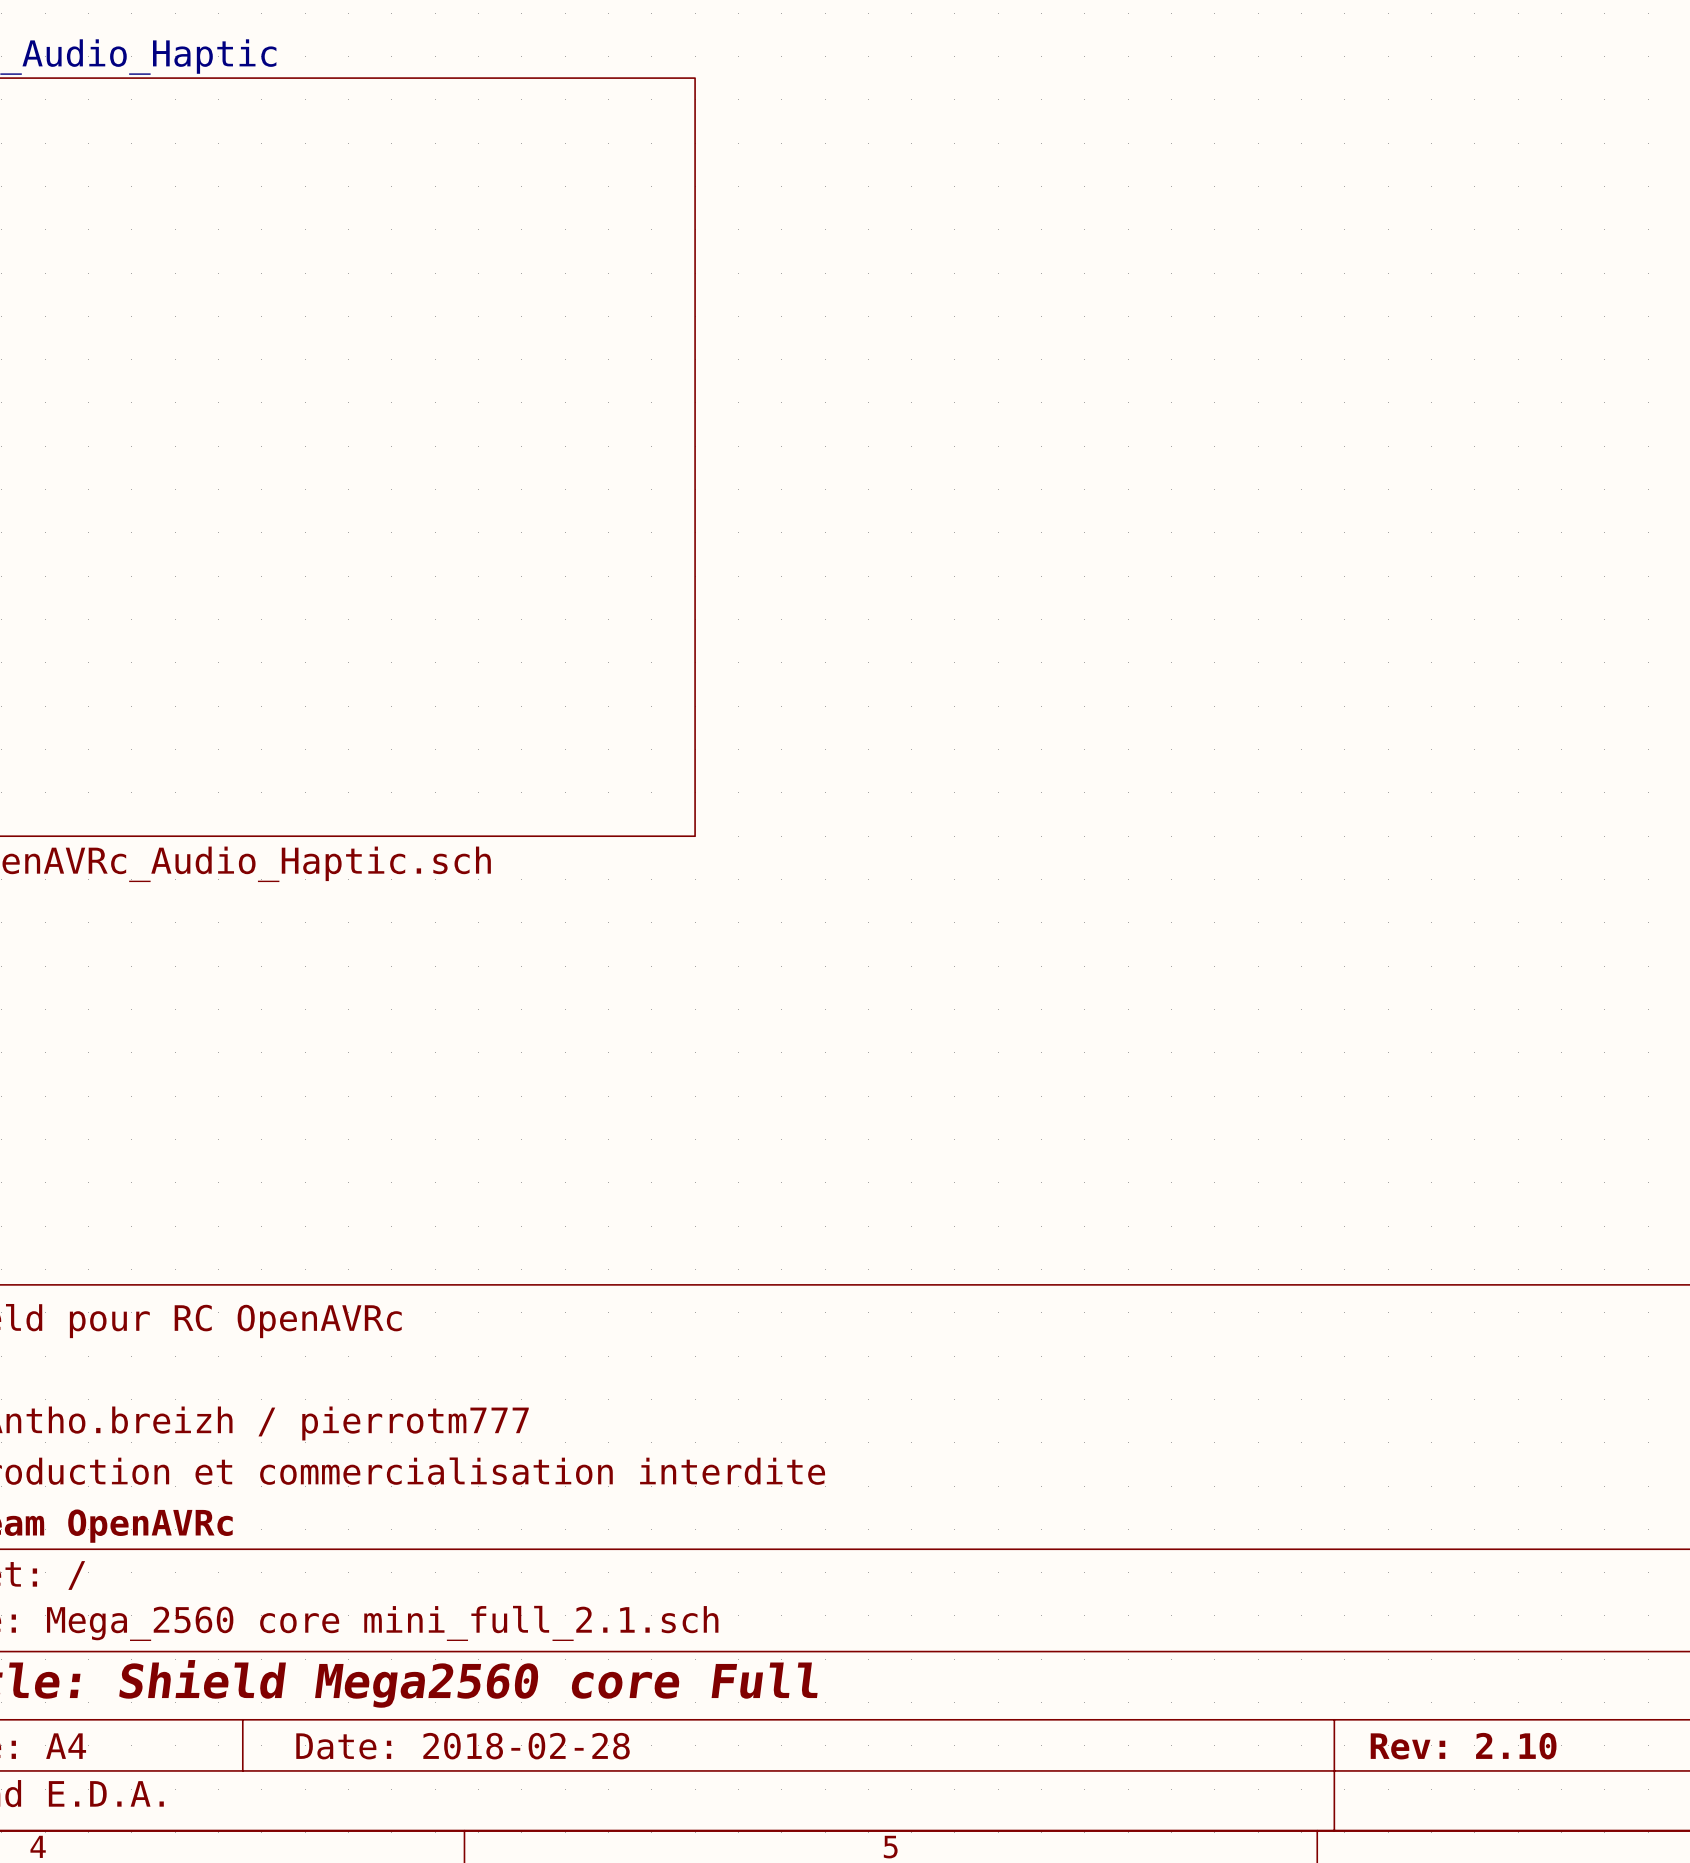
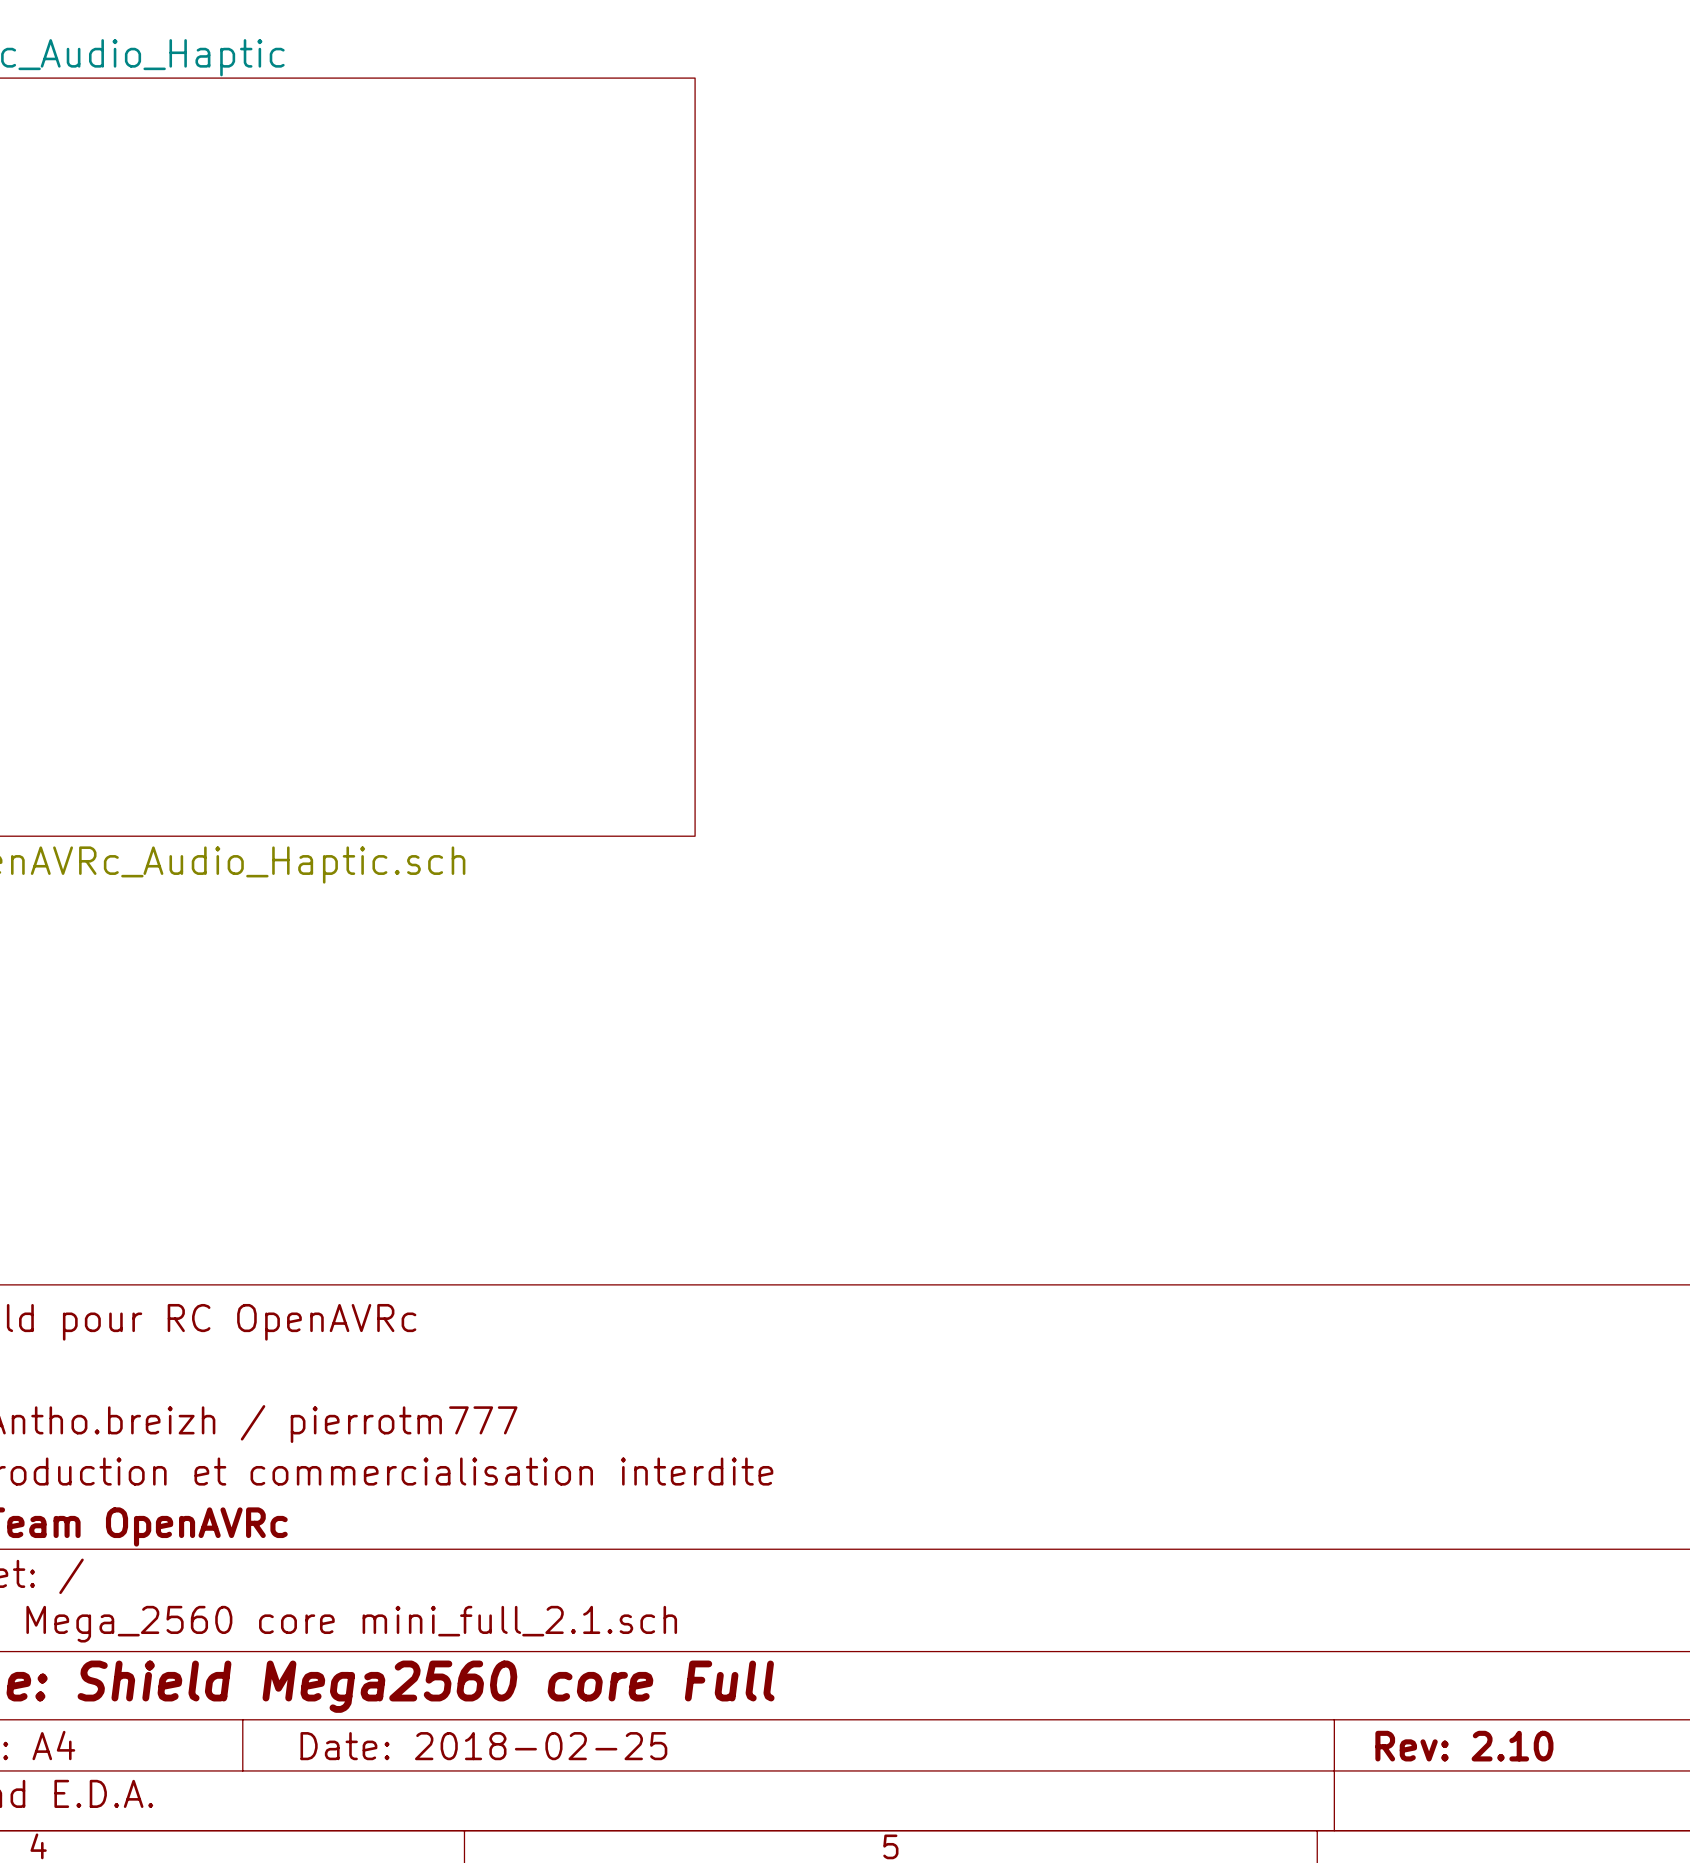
title block: Date: 2018-02-28 (463, 1746) -> Date: 2018-02-25 (483, 1746)

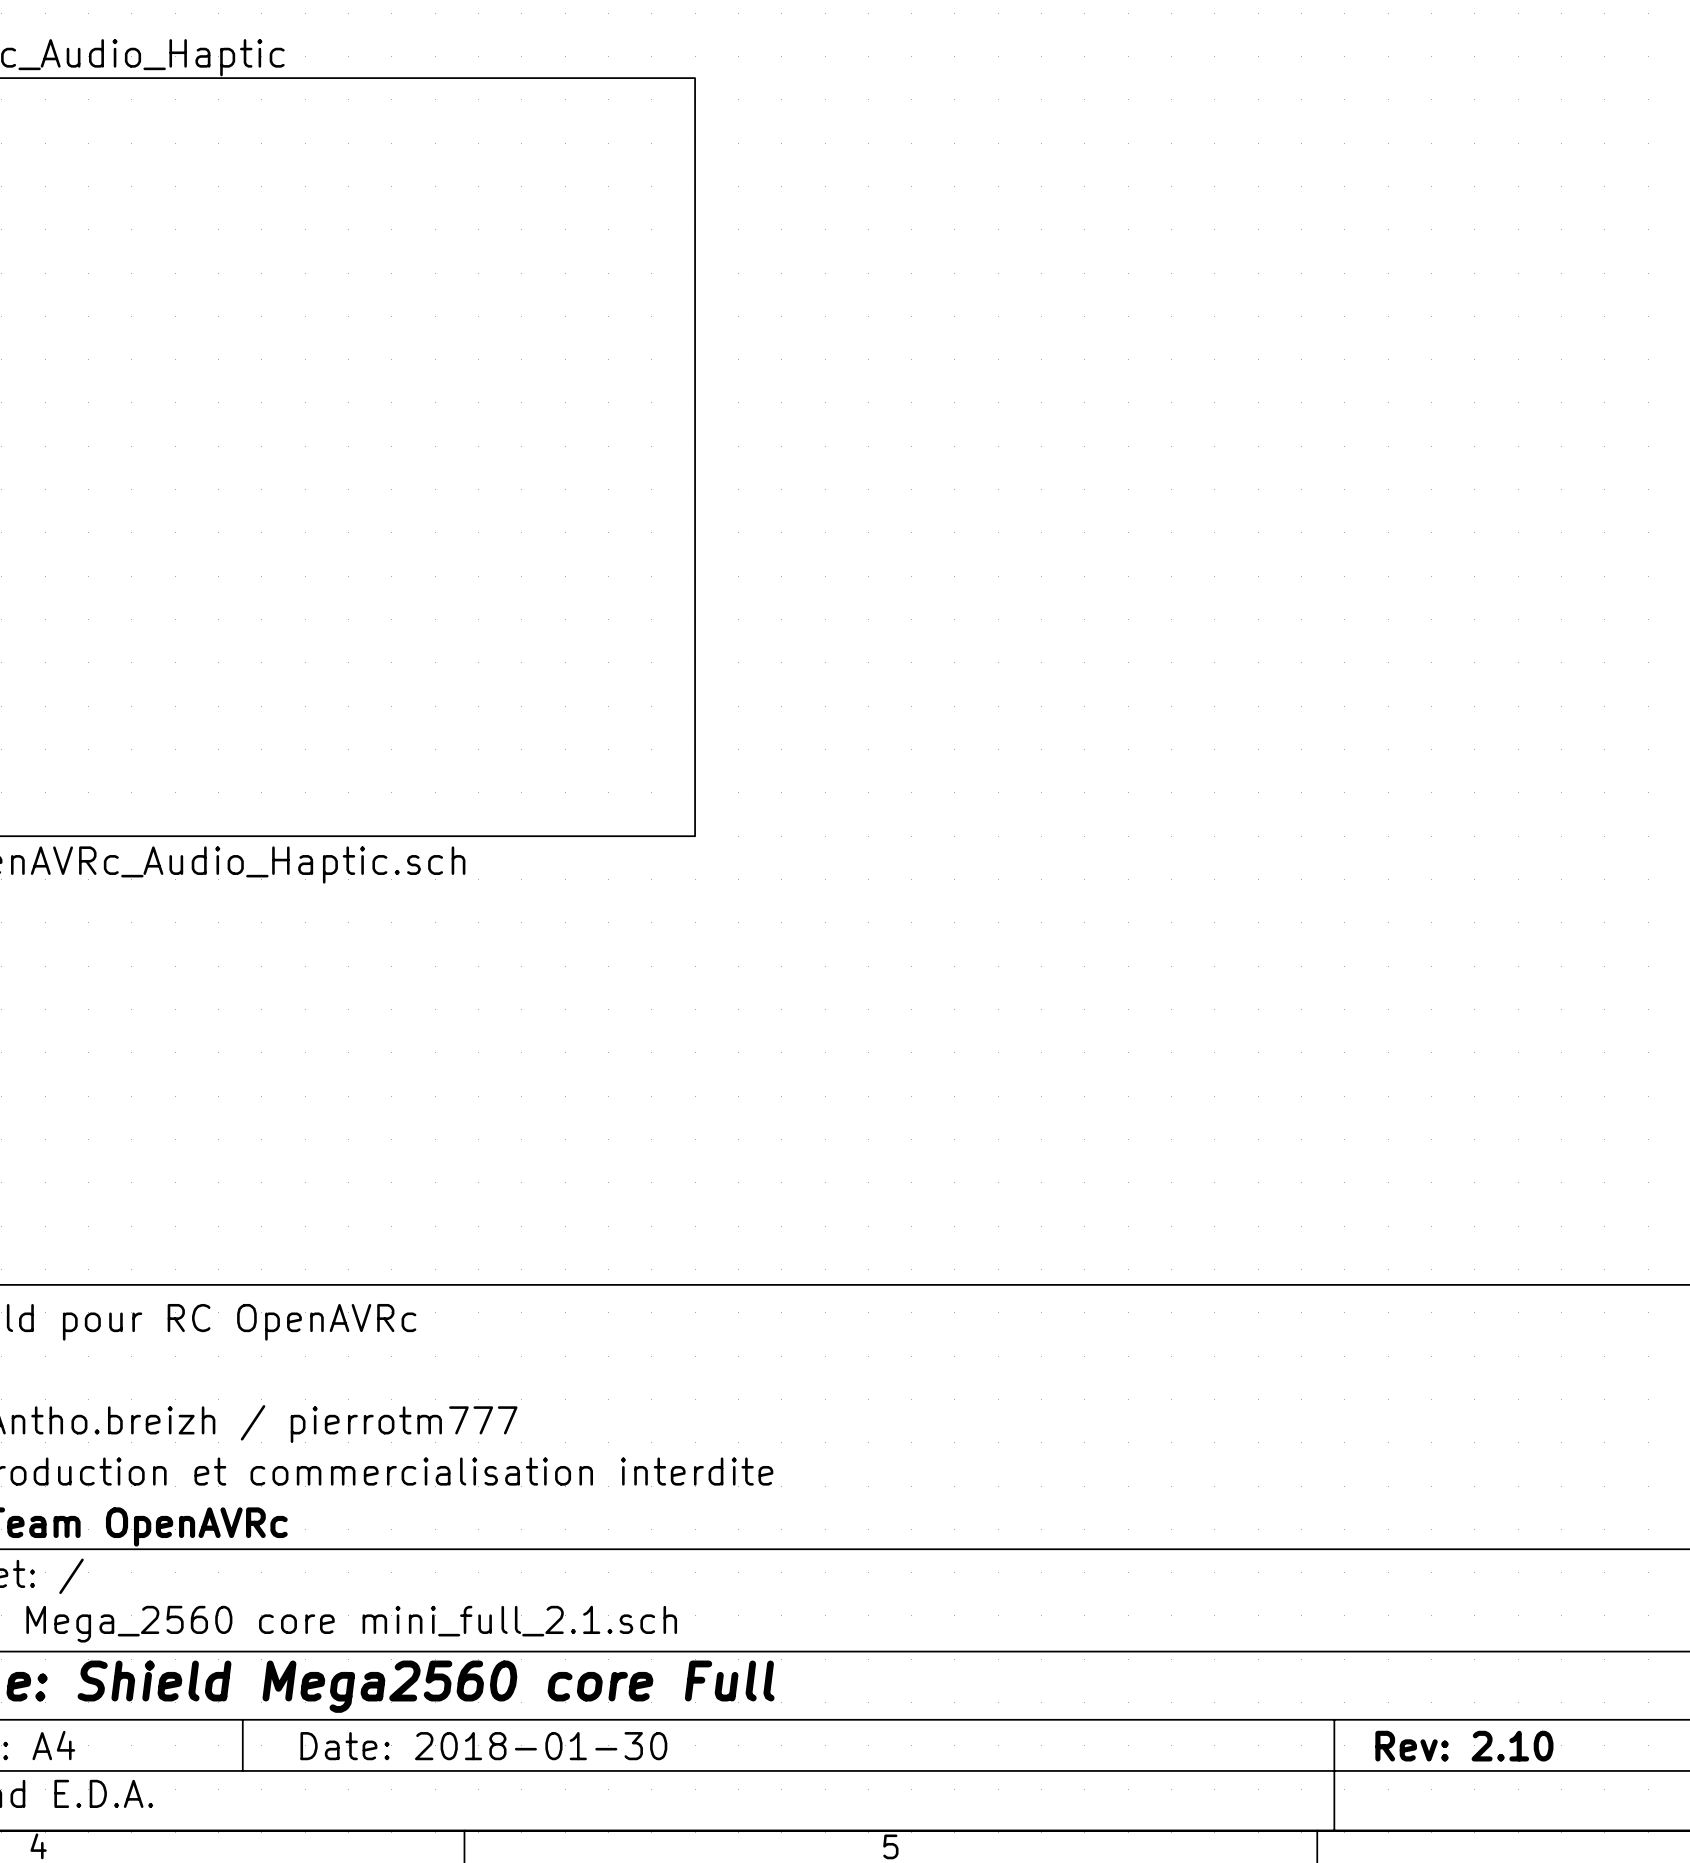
title block: Date: 2018-02-25 (483, 1746) -> Date: 2018-01-30 (483, 1746)

